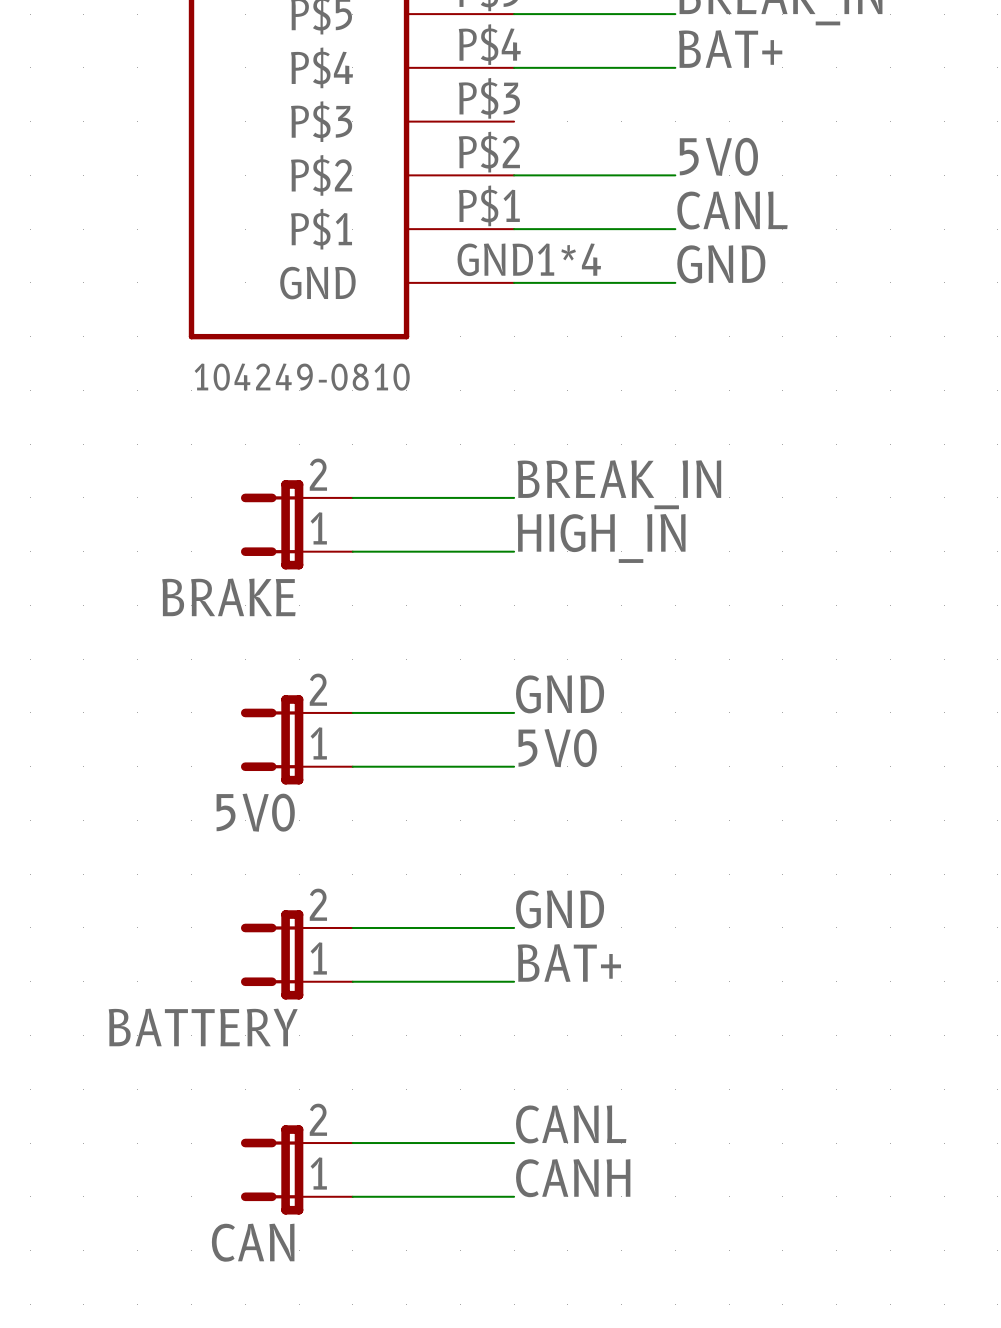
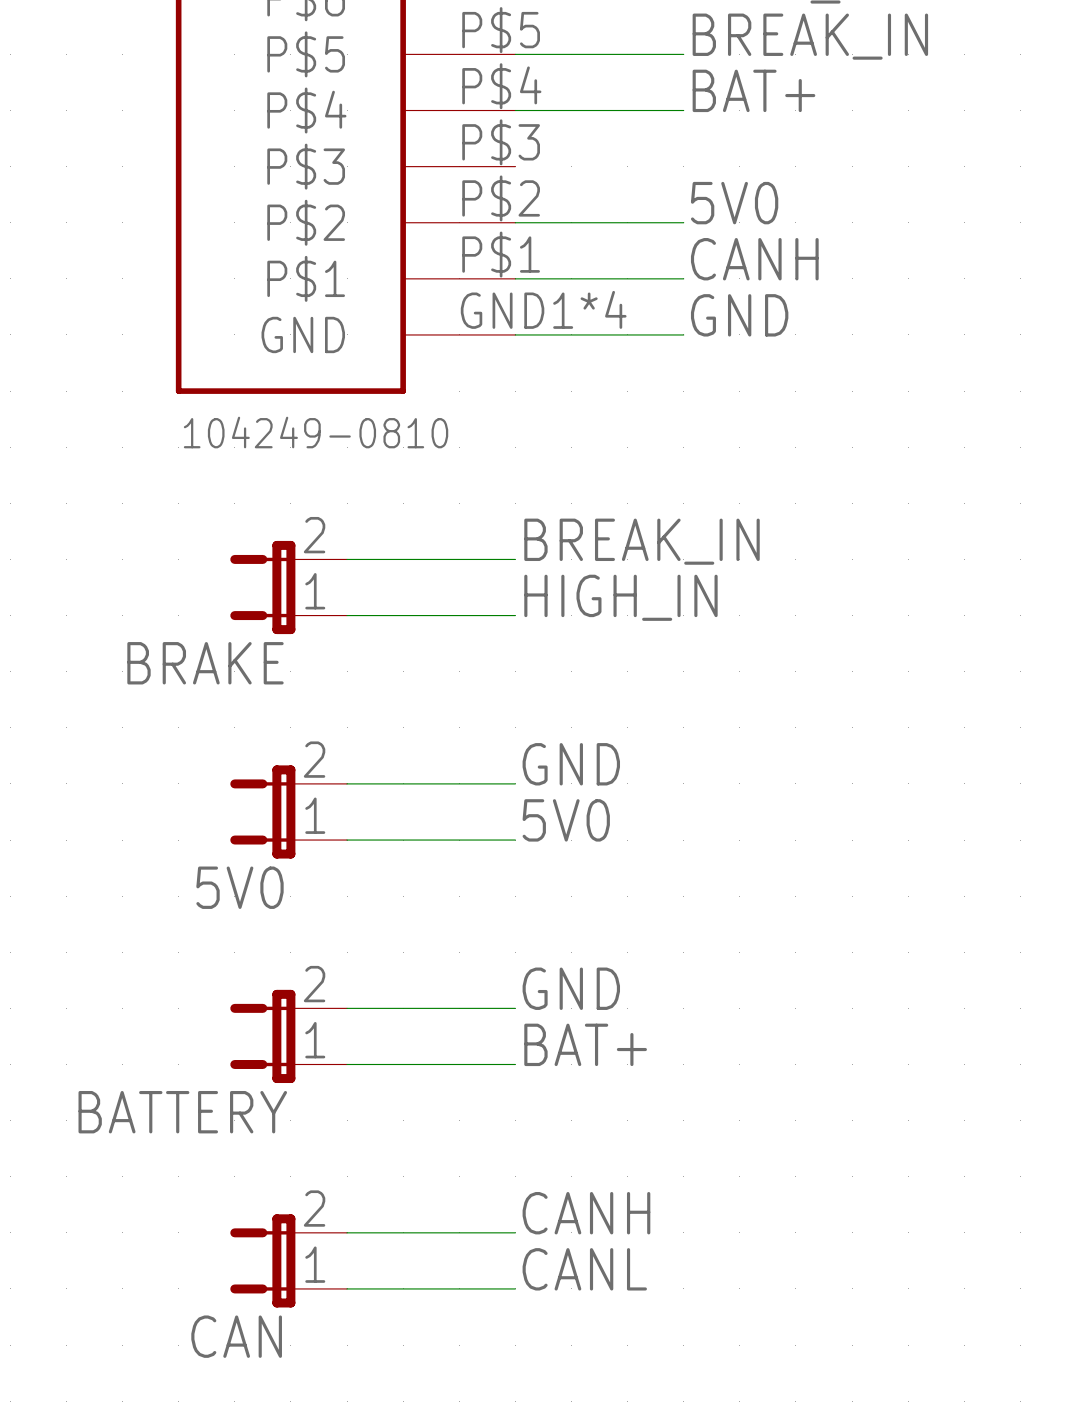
label: CANL (732, 210) -> CANH (754, 259)
label: CANL (571, 1124) -> CANH (586, 1213)
label: CANH (573, 1178) -> CANL (584, 1269)

